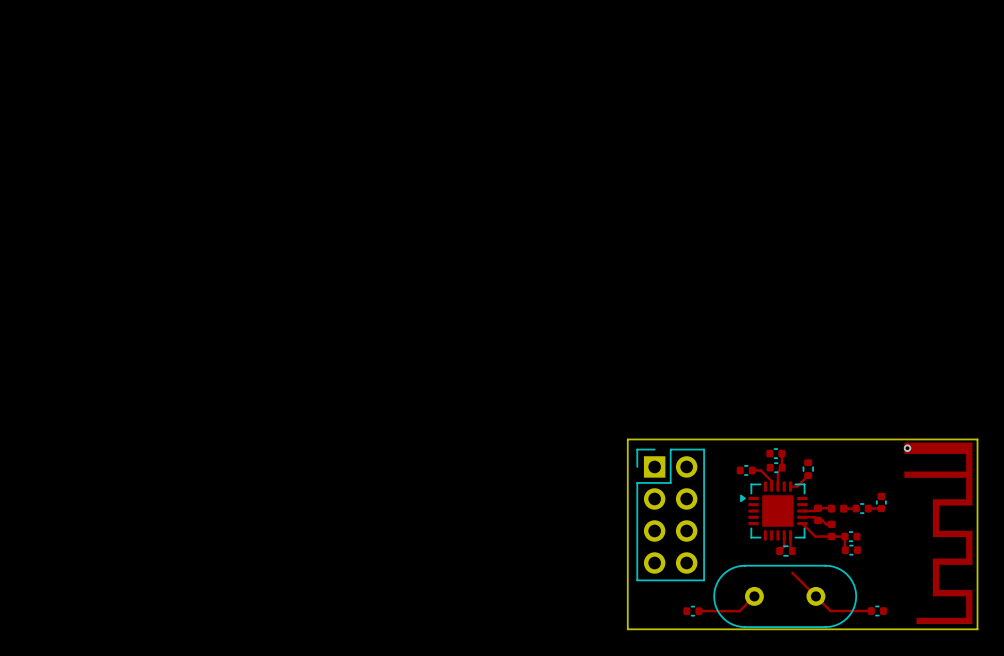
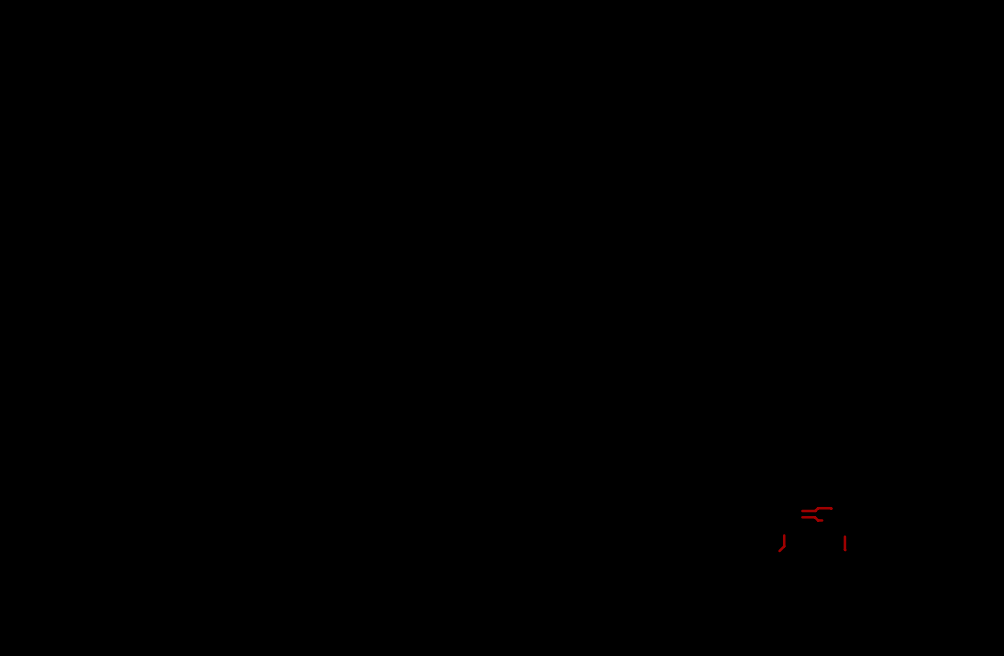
board edge: (627, 439) (977, 439) (977, 629) (627, 629) (627, 439) -> none
via: (907, 448) -> none
part: (775, 453) -> none
top track: (781, 453) (782, 467) (777, 472) (777, 486) -> none
part: (776, 467) -> none
part: (808, 469) -> none
part: (746, 470) -> none
top track: (752, 470) (760, 470) (771, 481) (771, 486) -> none
top track: (808, 475) (797, 486) (790, 486) -> none
part: (881, 502) -> none
part: (837, 508) -> none
top track: (843, 508) (856, 508) -> none
part: (862, 508) -> none
top track: (868, 508) (881, 508) -> none
part: (773, 511) -> none
part: (670, 514) -> none
part: (818, 514) -> none
top track: (822, 520) (826, 524) (831, 524) -> none
top track: (802, 523) (815, 536) (844, 536) -> none
part: (831, 530) -> none
part: (938, 533) -> none
top track: (790, 535) (790, 549) (792, 551) -> none
part: (850, 536) -> none
part: (851, 550) -> none
part: (785, 551) -> none
top track: (792, 572) (830, 611) (871, 611) -> none
top track: (754, 596) (739, 611) (698, 611) -> none
part: (785, 596) -> none
part: (692, 611) -> none
part: (877, 611) -> none

